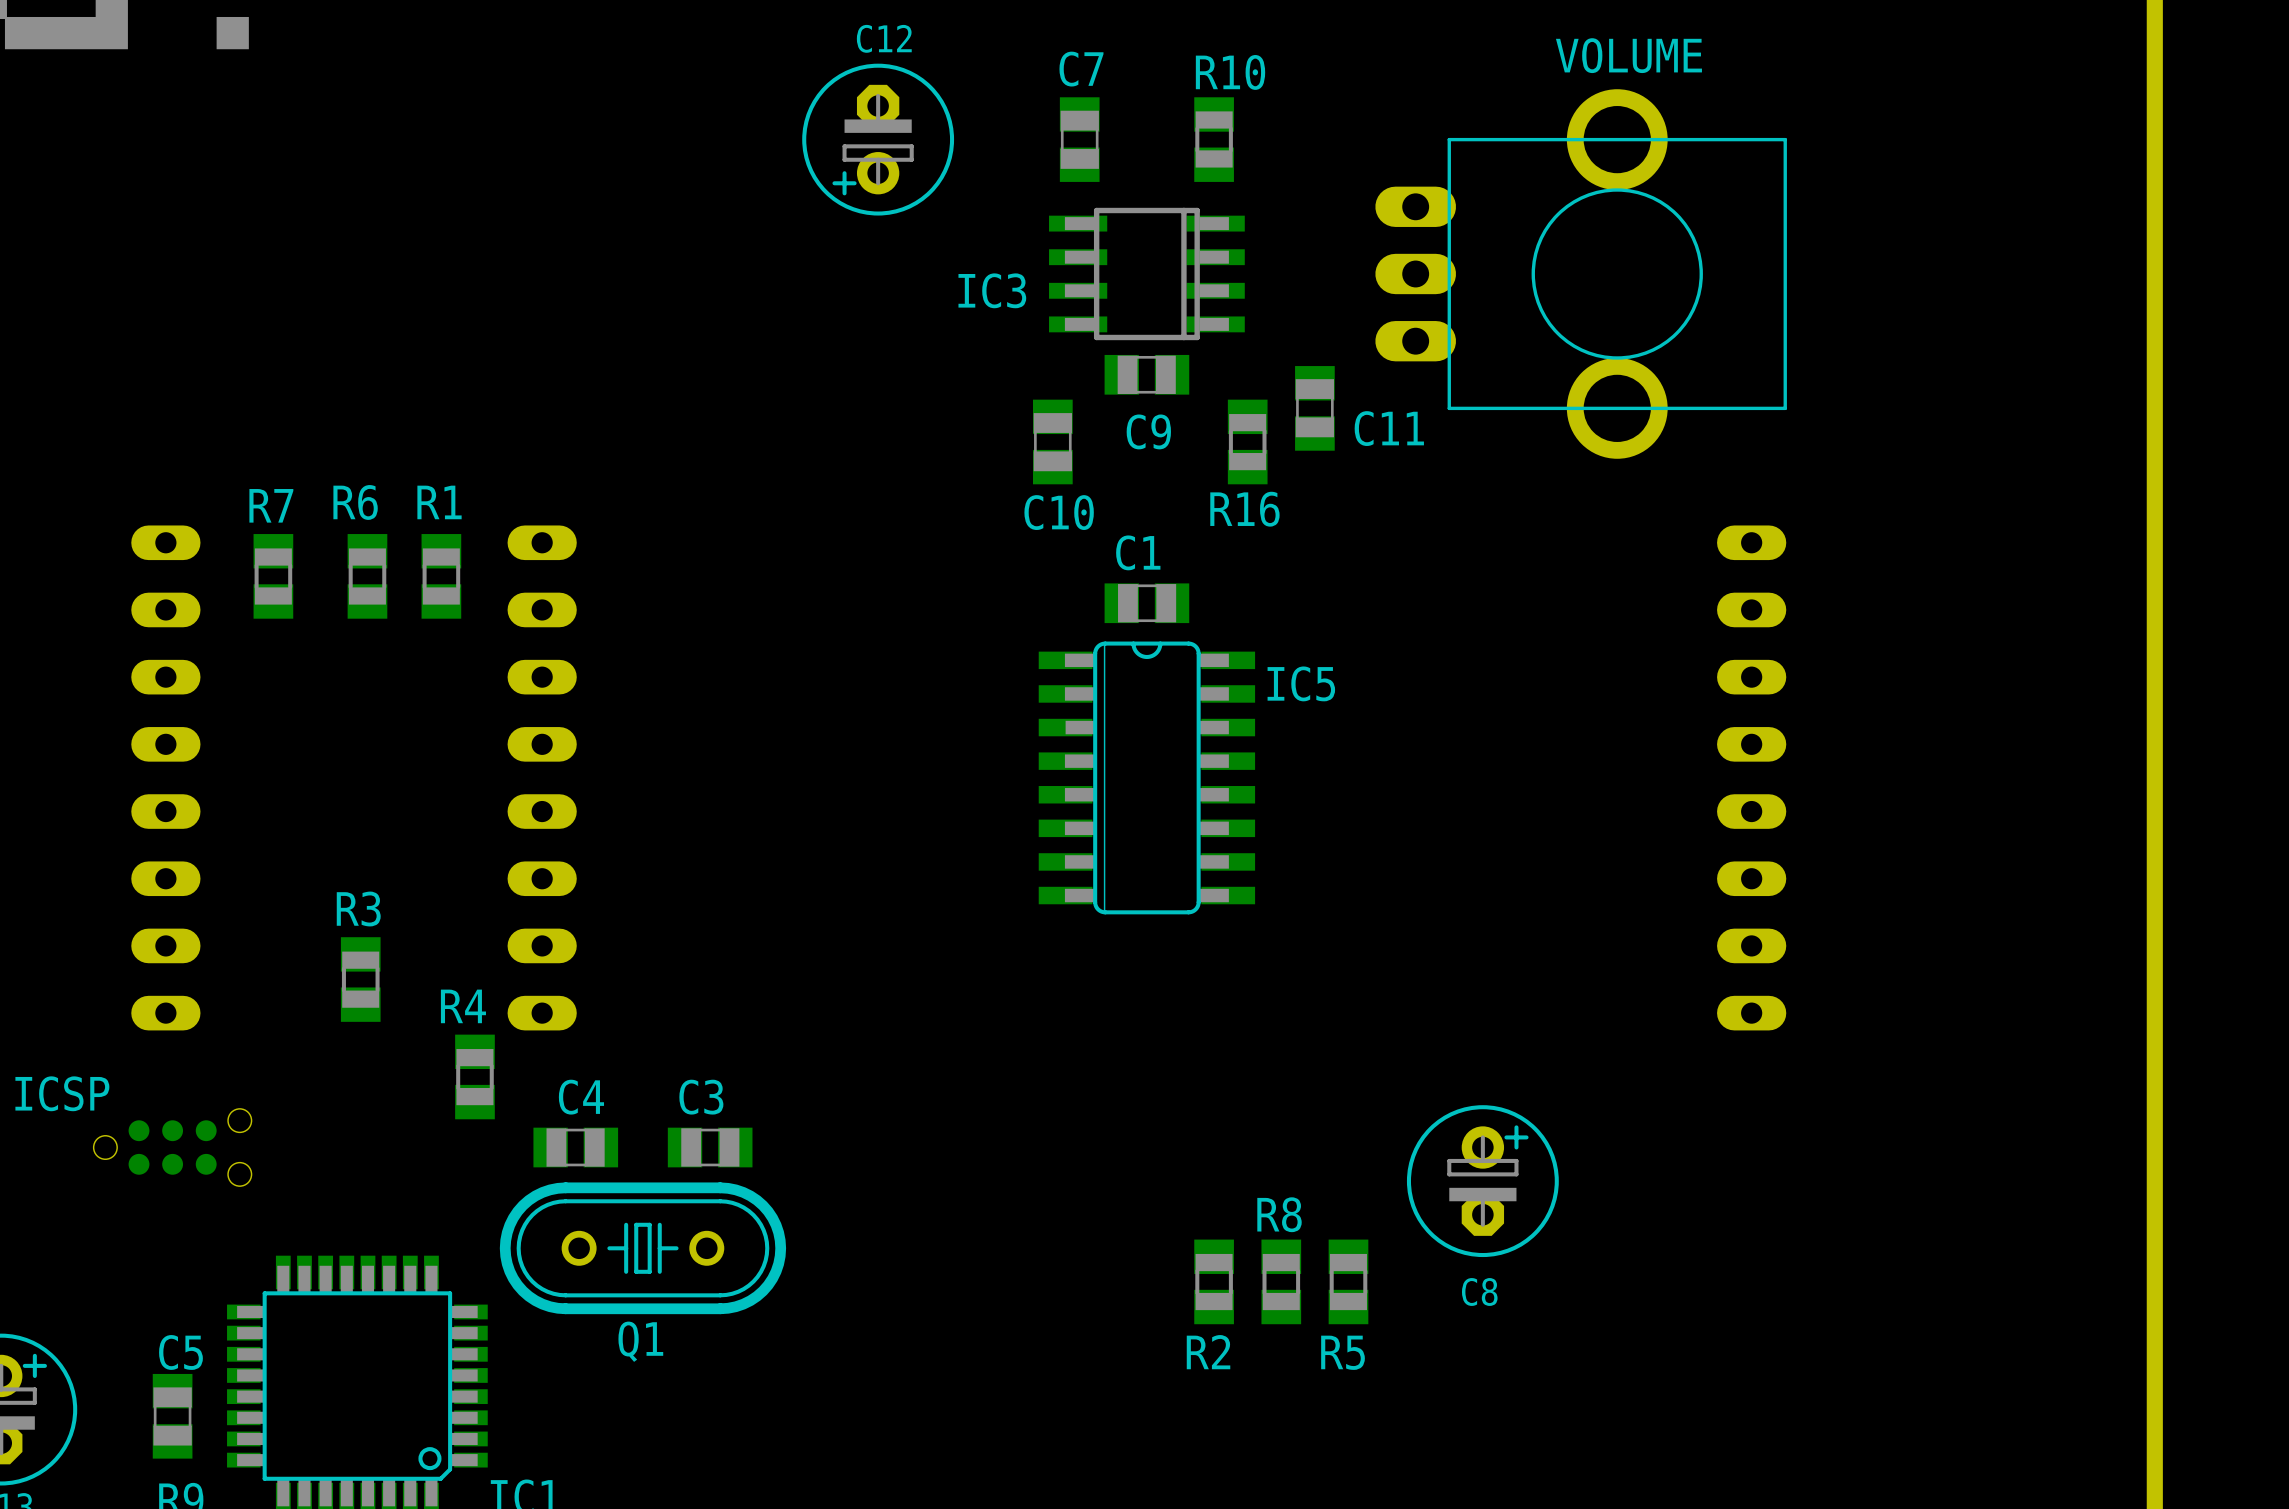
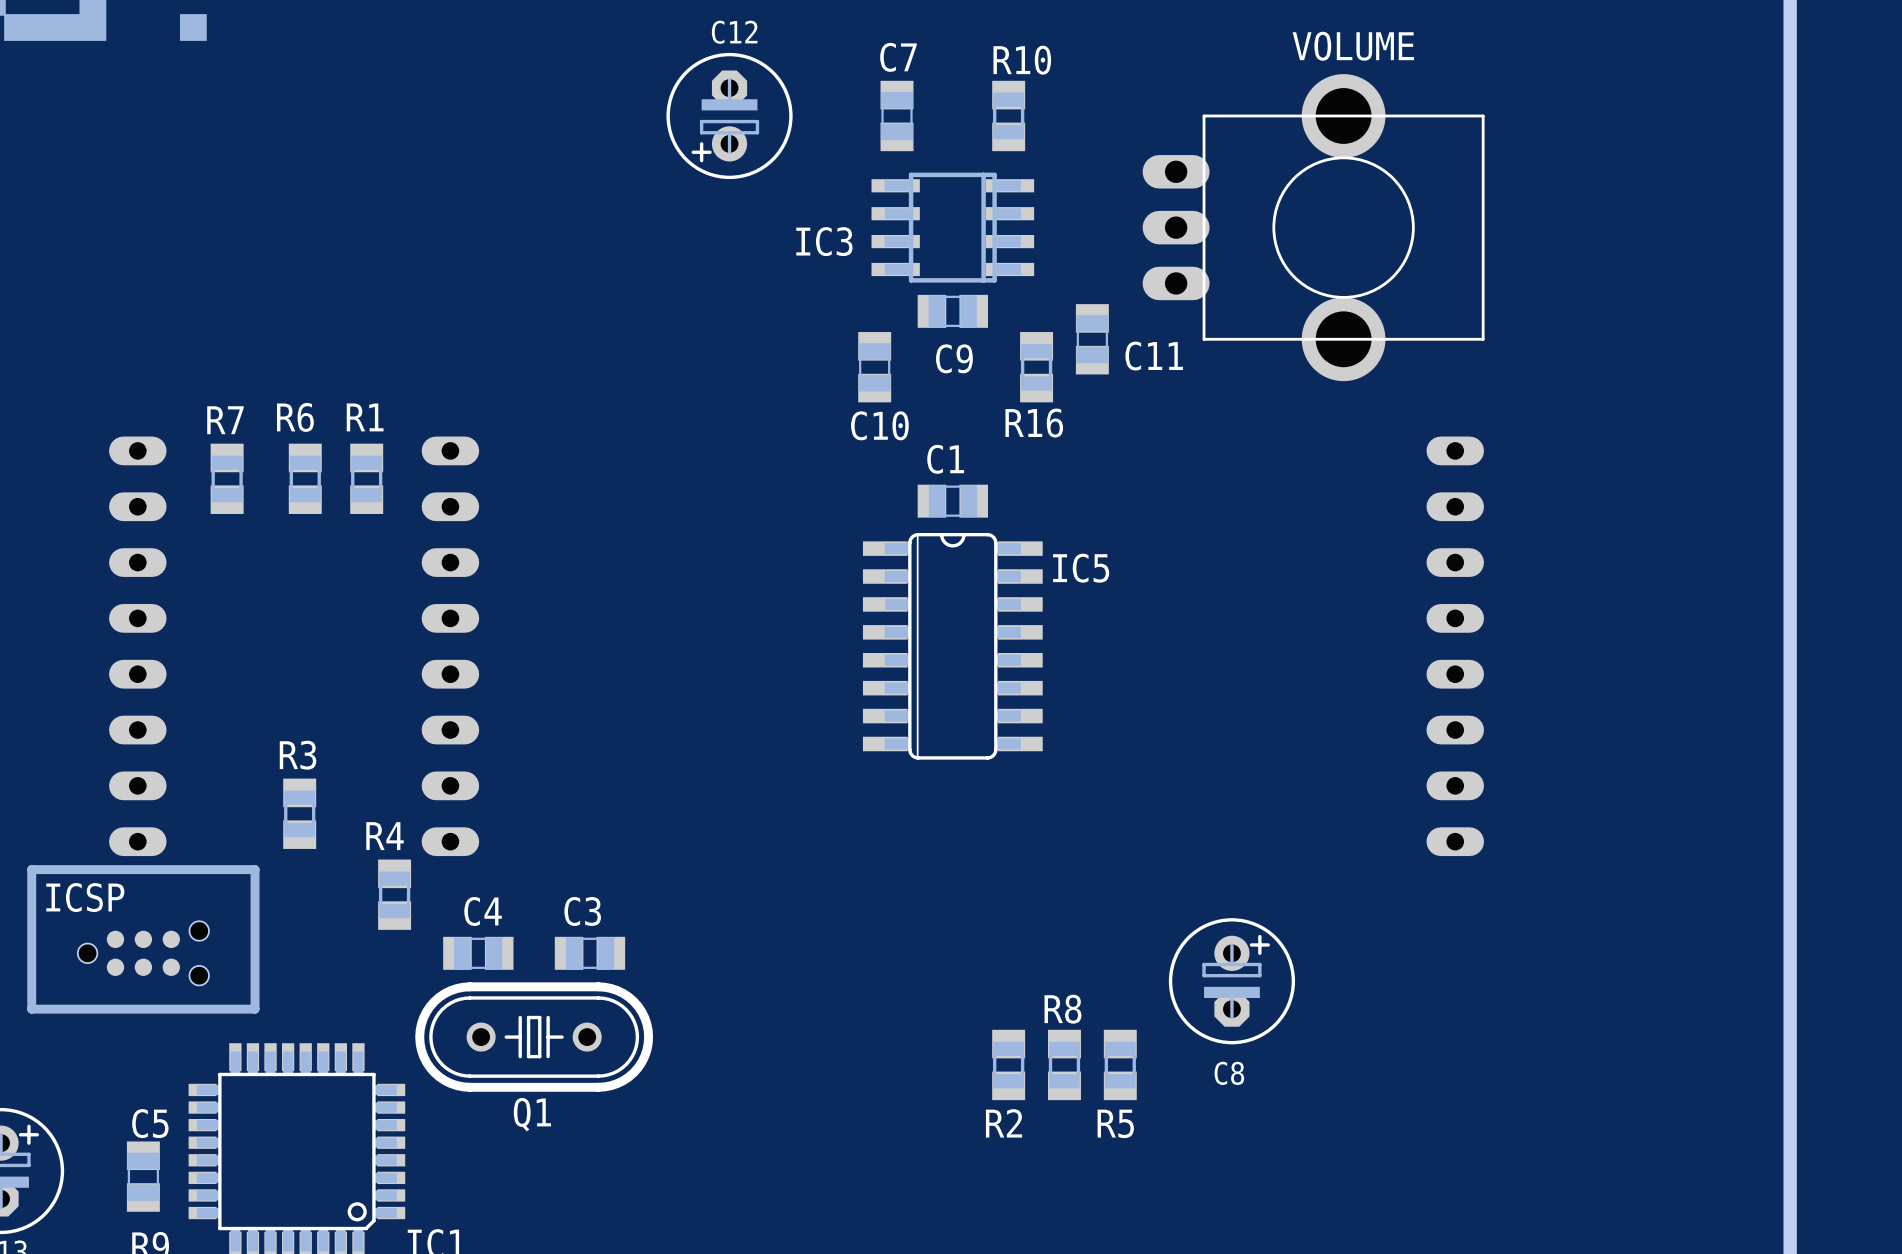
line: none -> (255, 869) (31, 869) (31, 1009) (255, 1009) (255, 869)
ICSP name position: ICSP (62, 1093) -> ICSP (85, 897)

